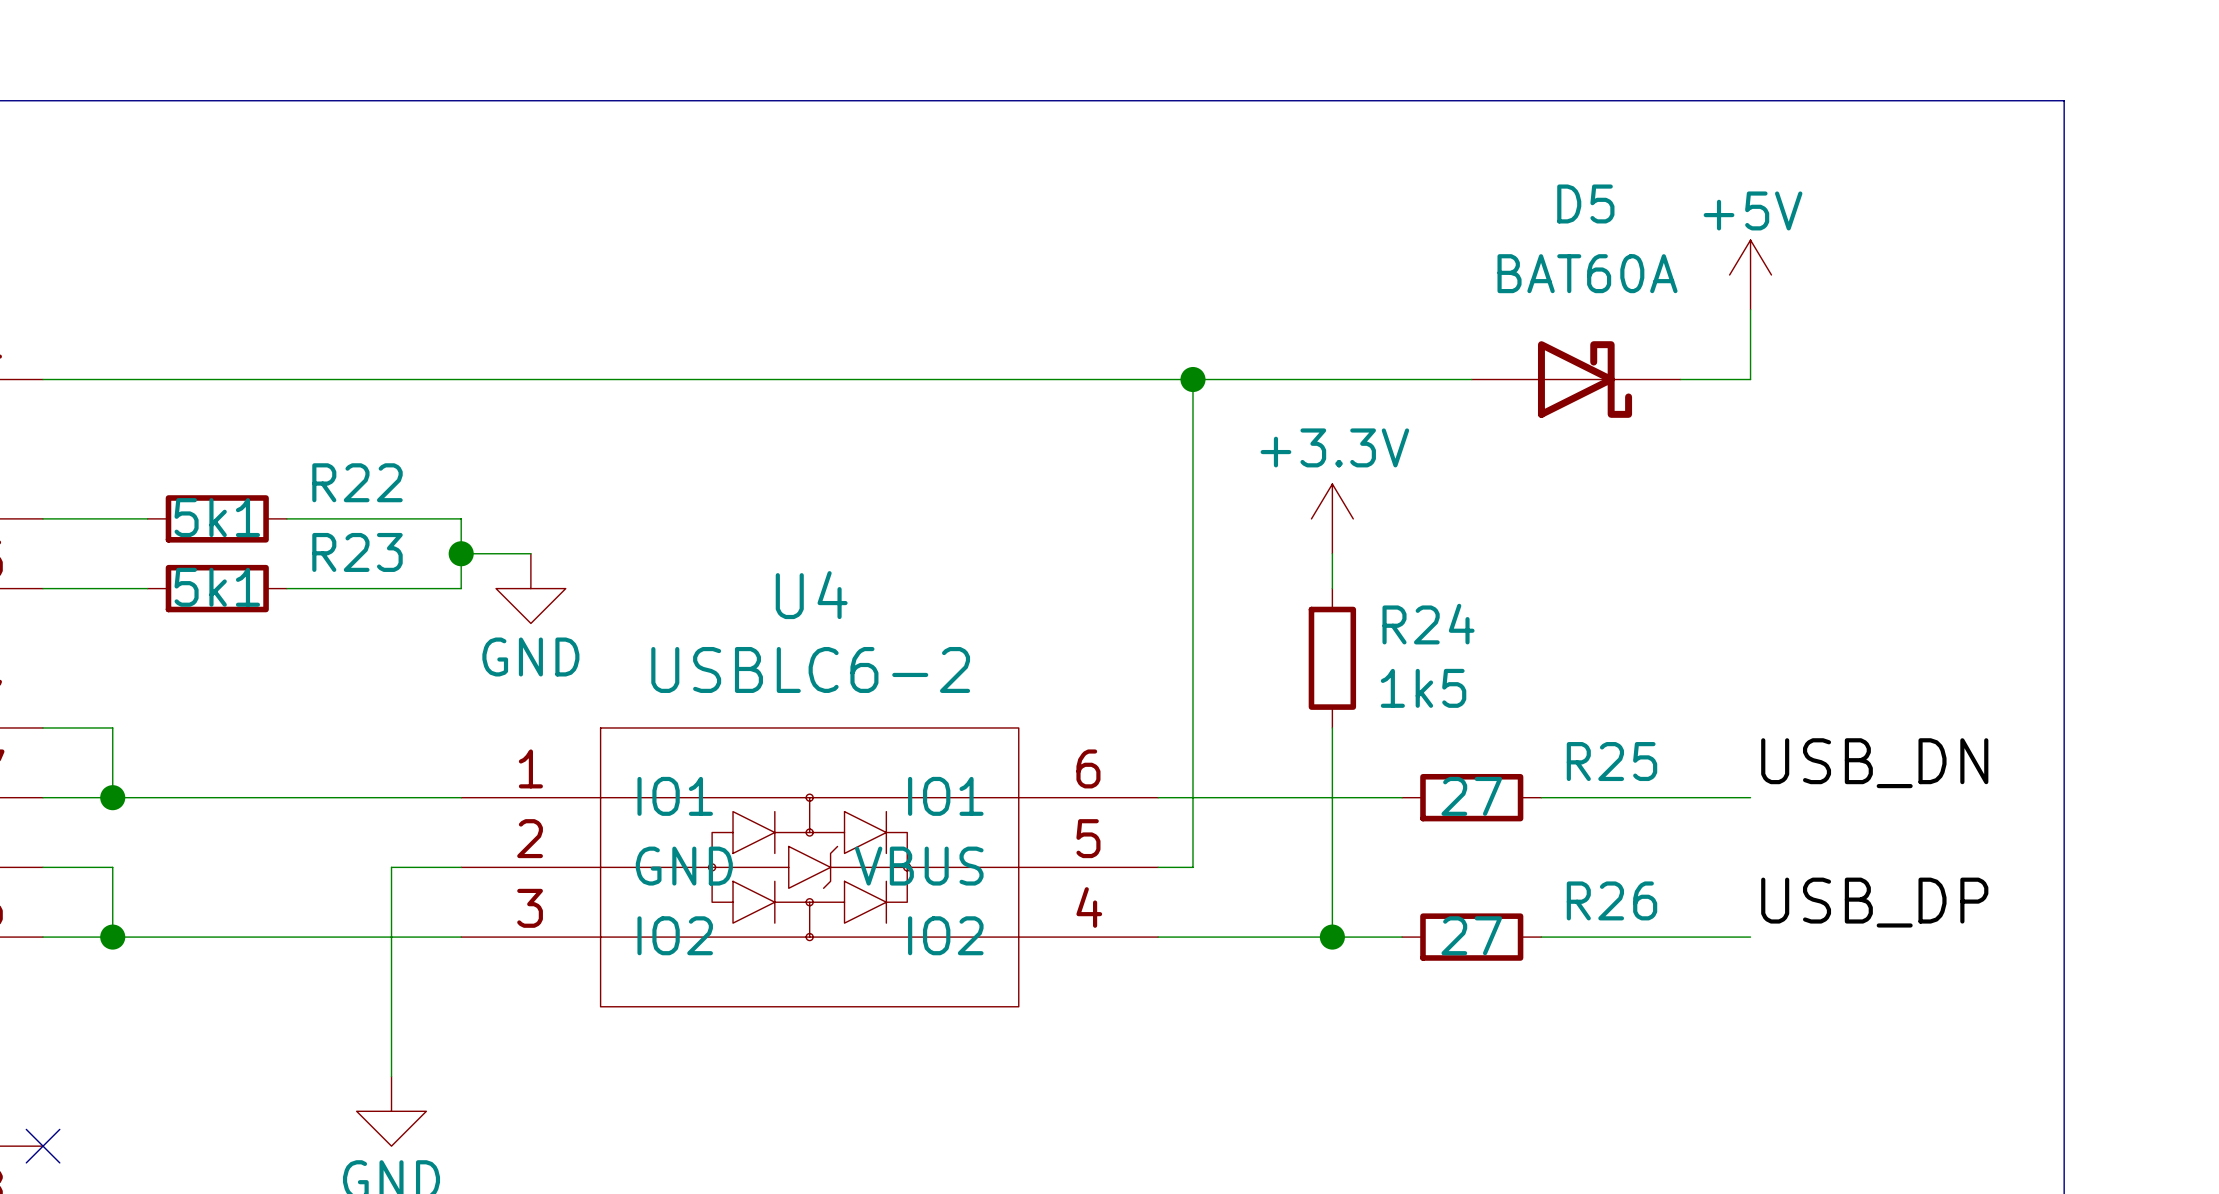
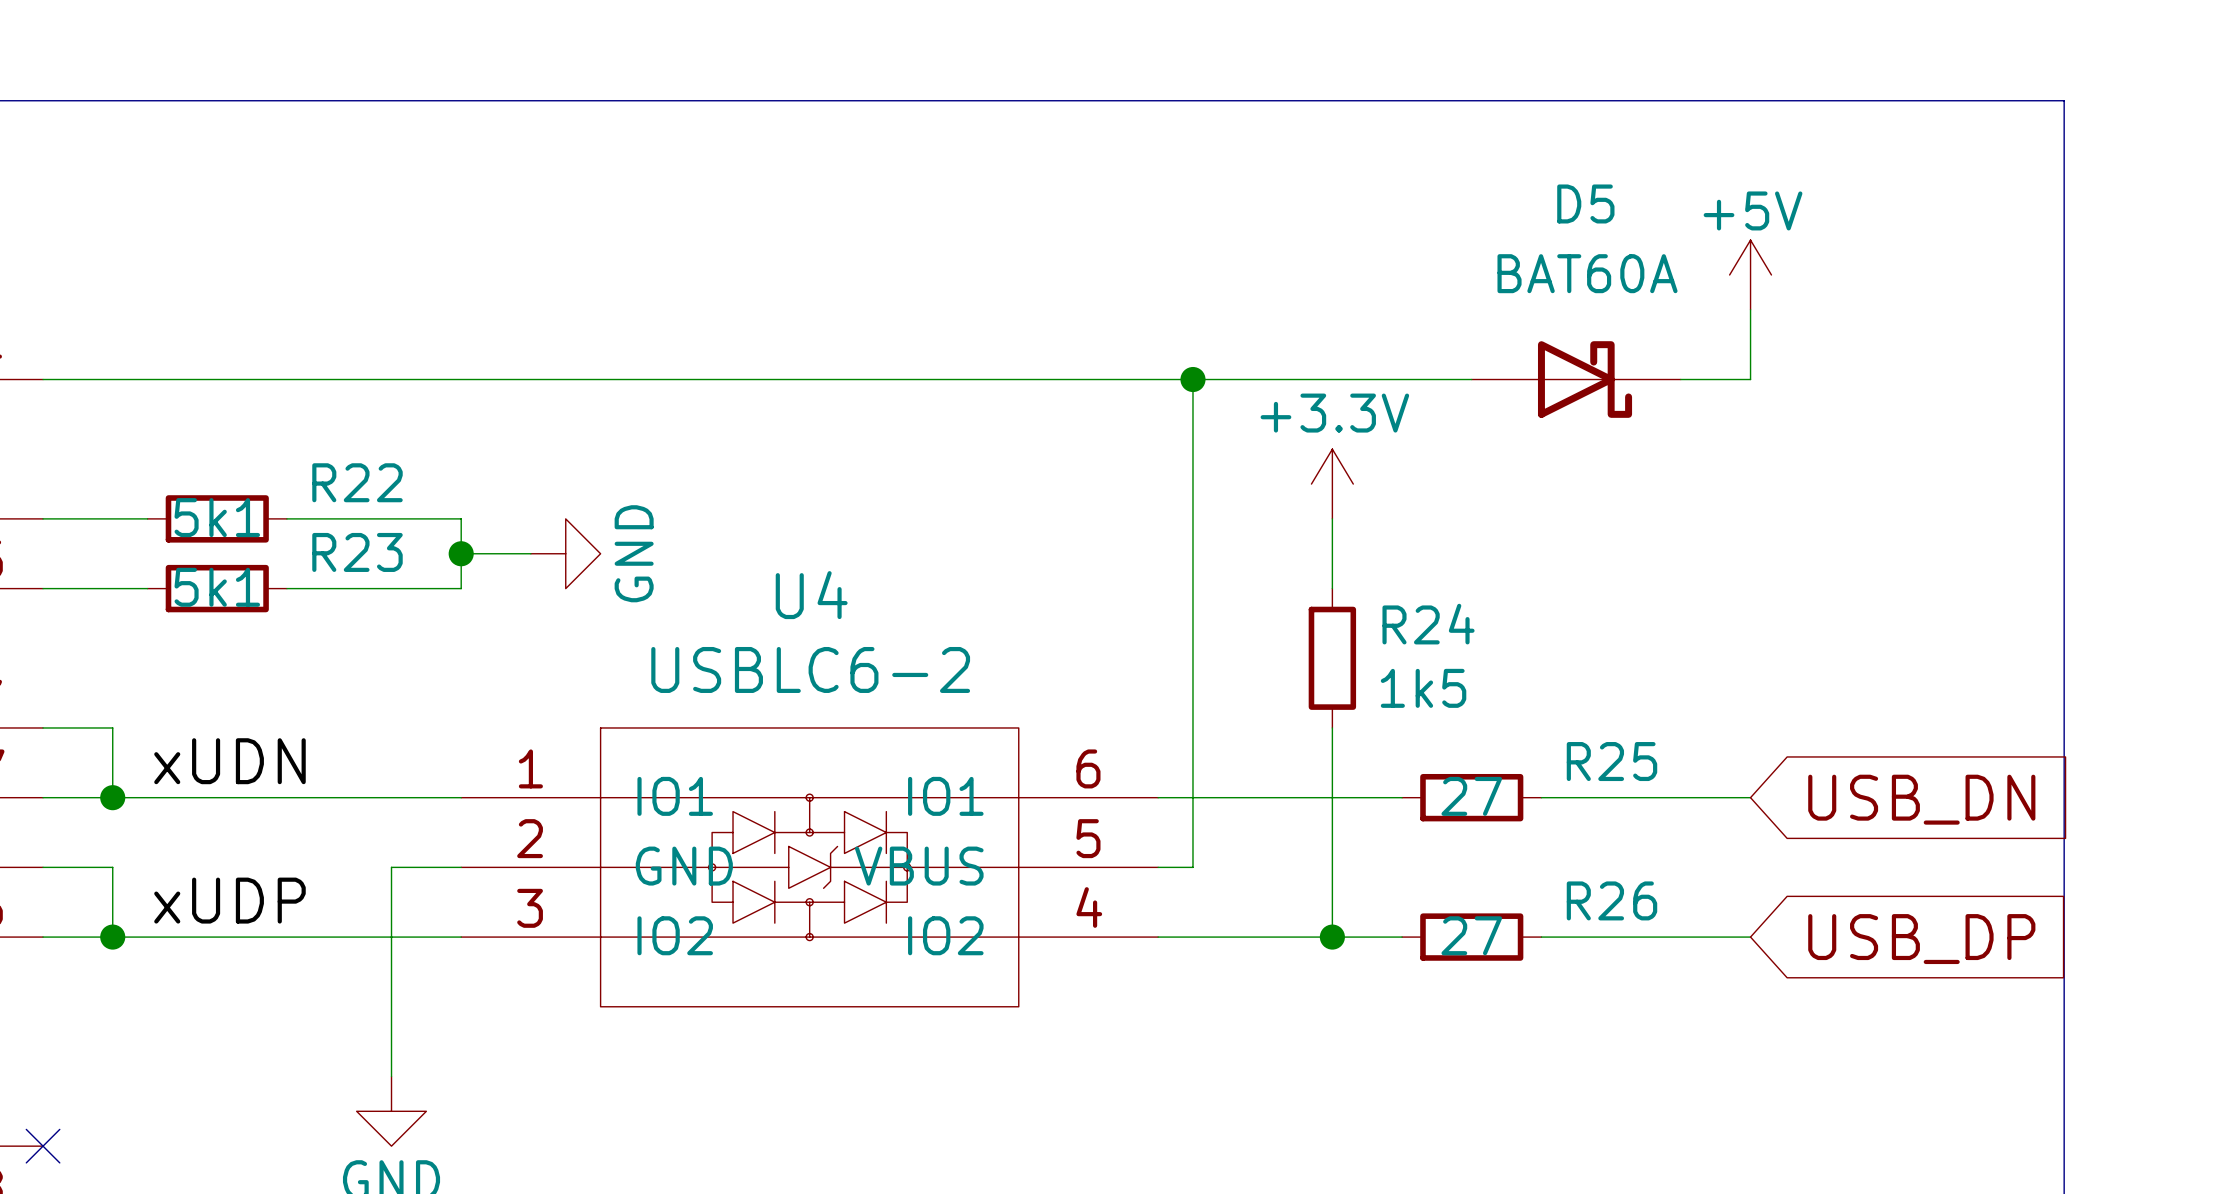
power symbol position: +3.3V (1332, 518) -> +3.3V (1332, 484)
power symbol rotation: 0° (530, 588) -> 90° counterclockwise (565, 553)
power symbol position: GND (530, 588) -> GND (565, 553)
label: none -> xUDN (229, 761)
label: USB_DN (1874, 763) -> none
global label: none -> USB_DN (1921, 799)
label: none -> xUDP (229, 900)
label: USB_DP (1874, 902) -> none
global label: none -> USB_DP (1921, 939)

